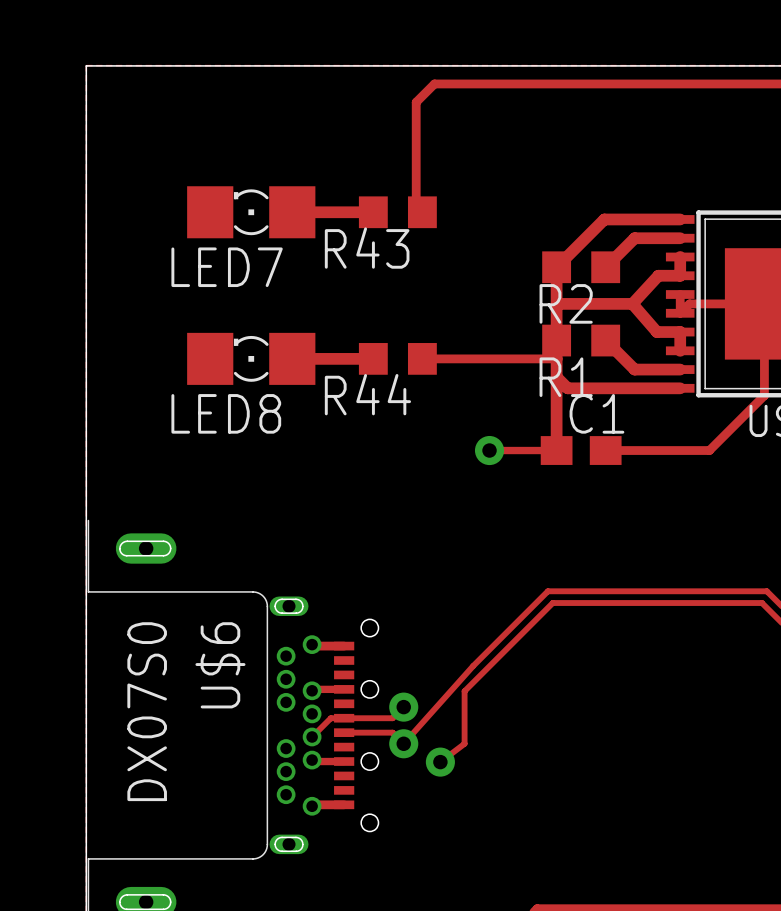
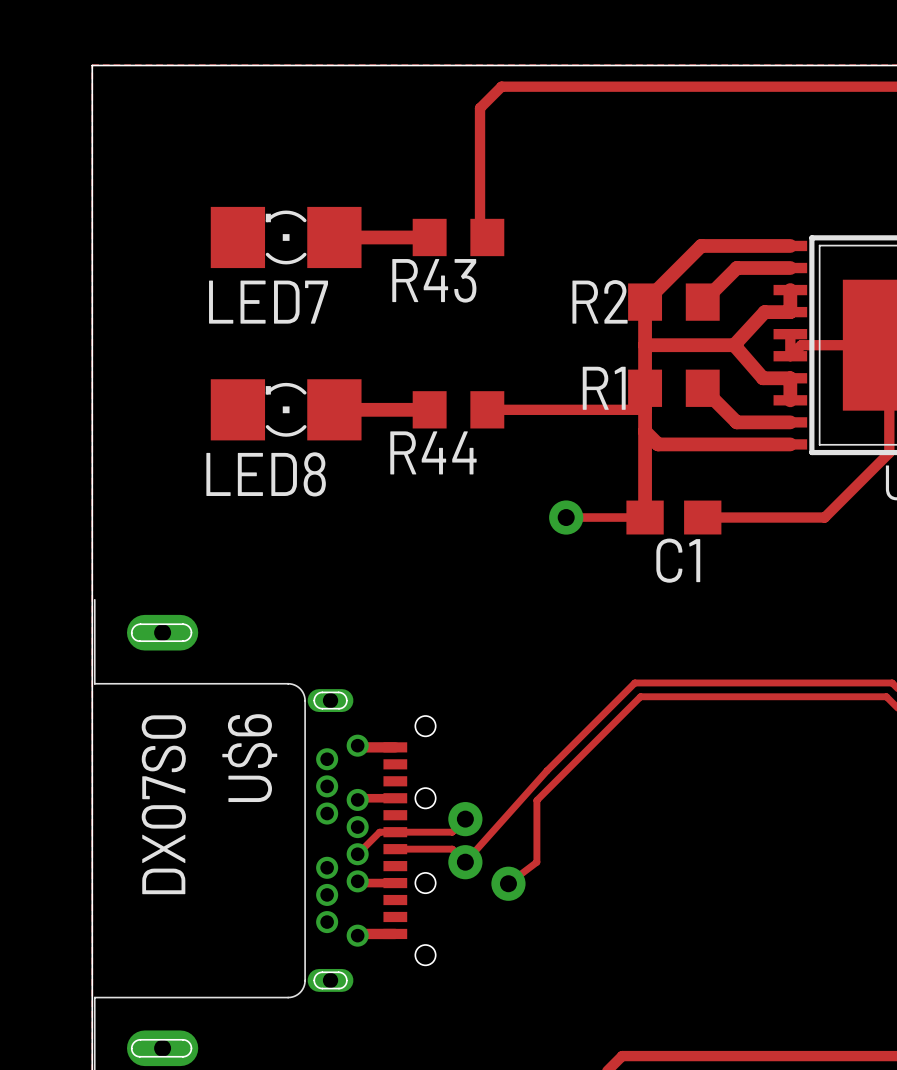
R2 name position: R2 (566, 303) -> R2 (600, 301)
R1 name position: R1 (566, 377) -> R1 (604, 388)
C1 name position: C1 (596, 413) -> C1 (678, 560)

